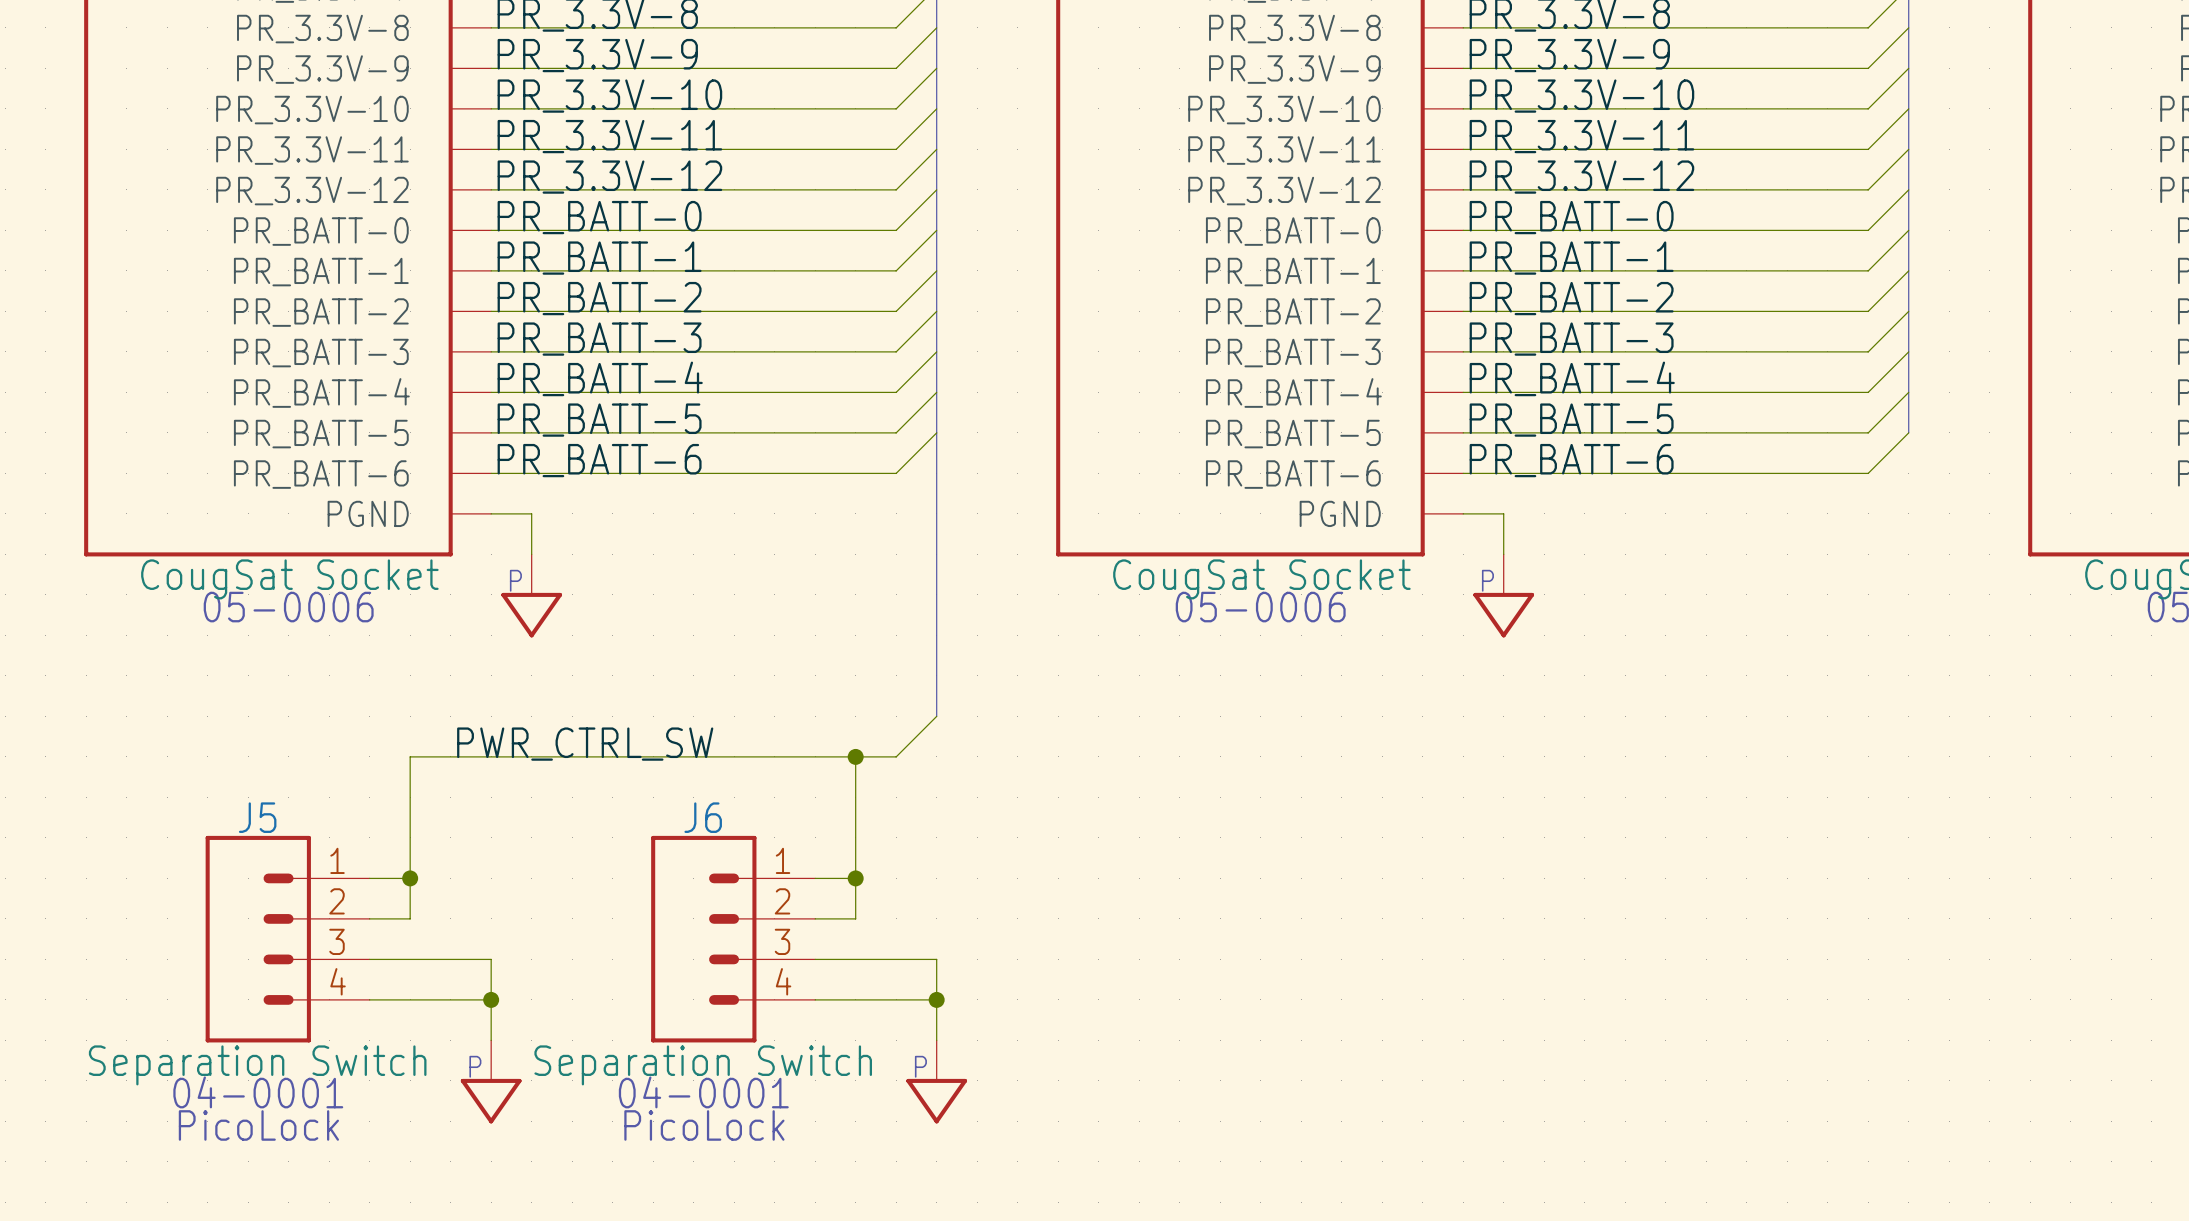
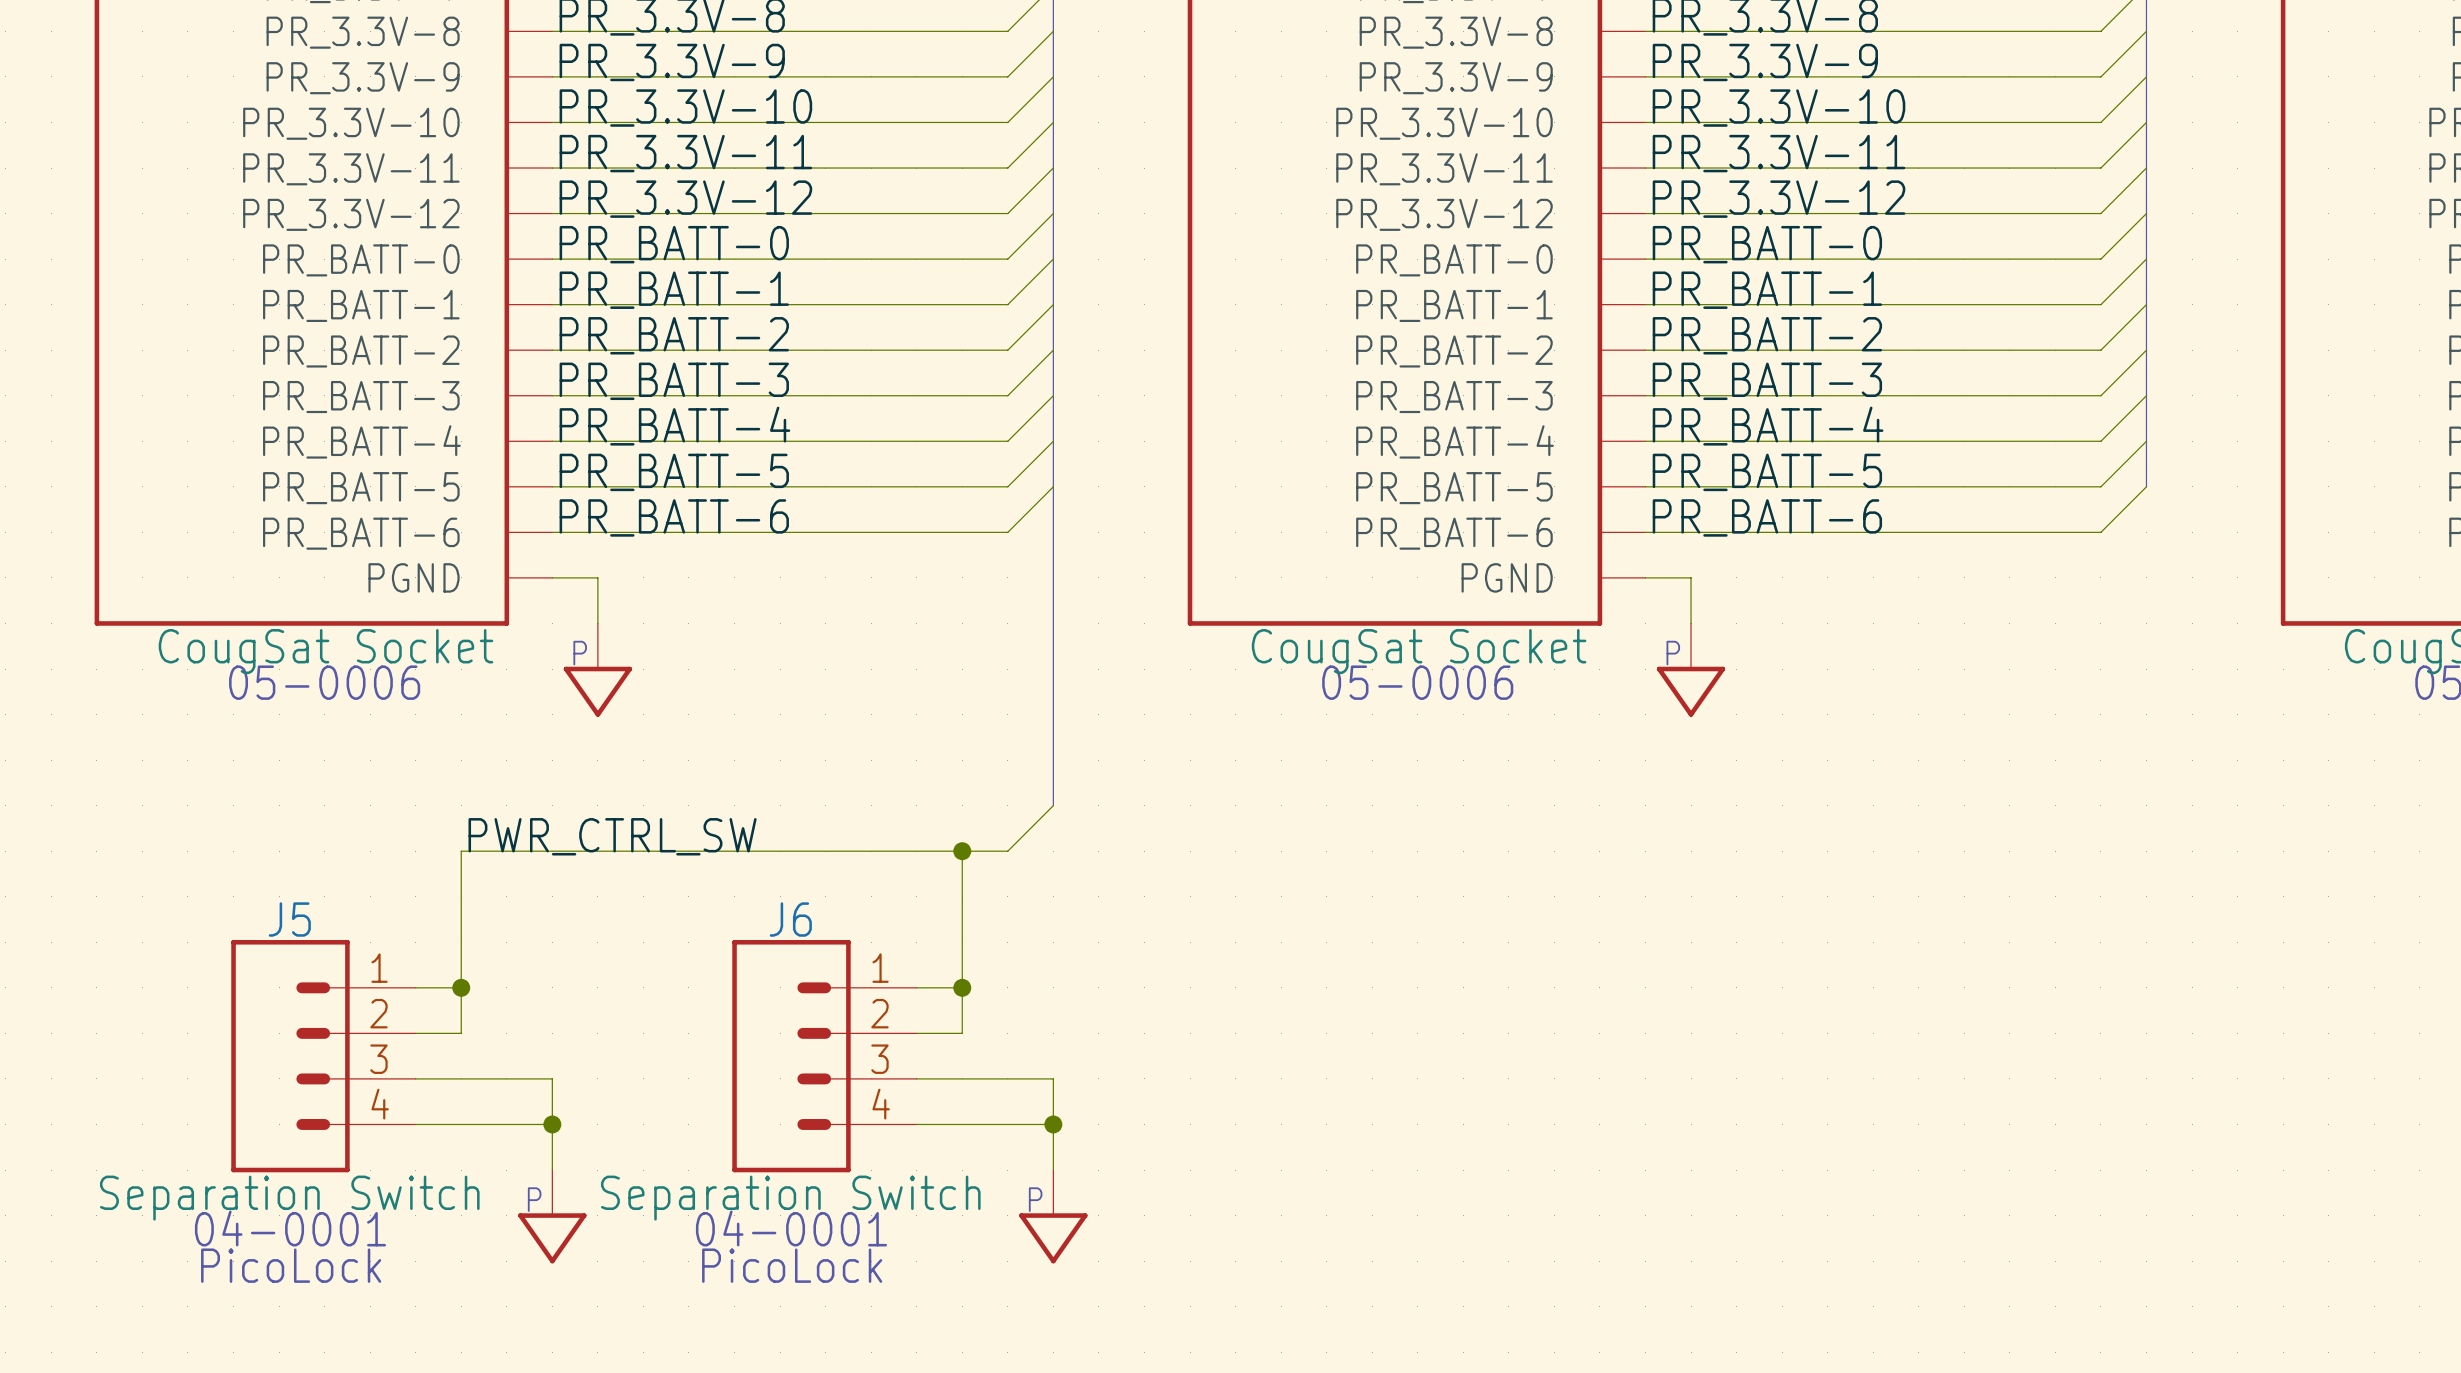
label position: PWR_CTRL_SW (585, 744) -> PWR_CTRL_SW (612, 836)

